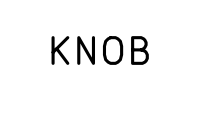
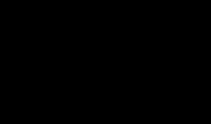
label: KNOB (100, 50) -> none

